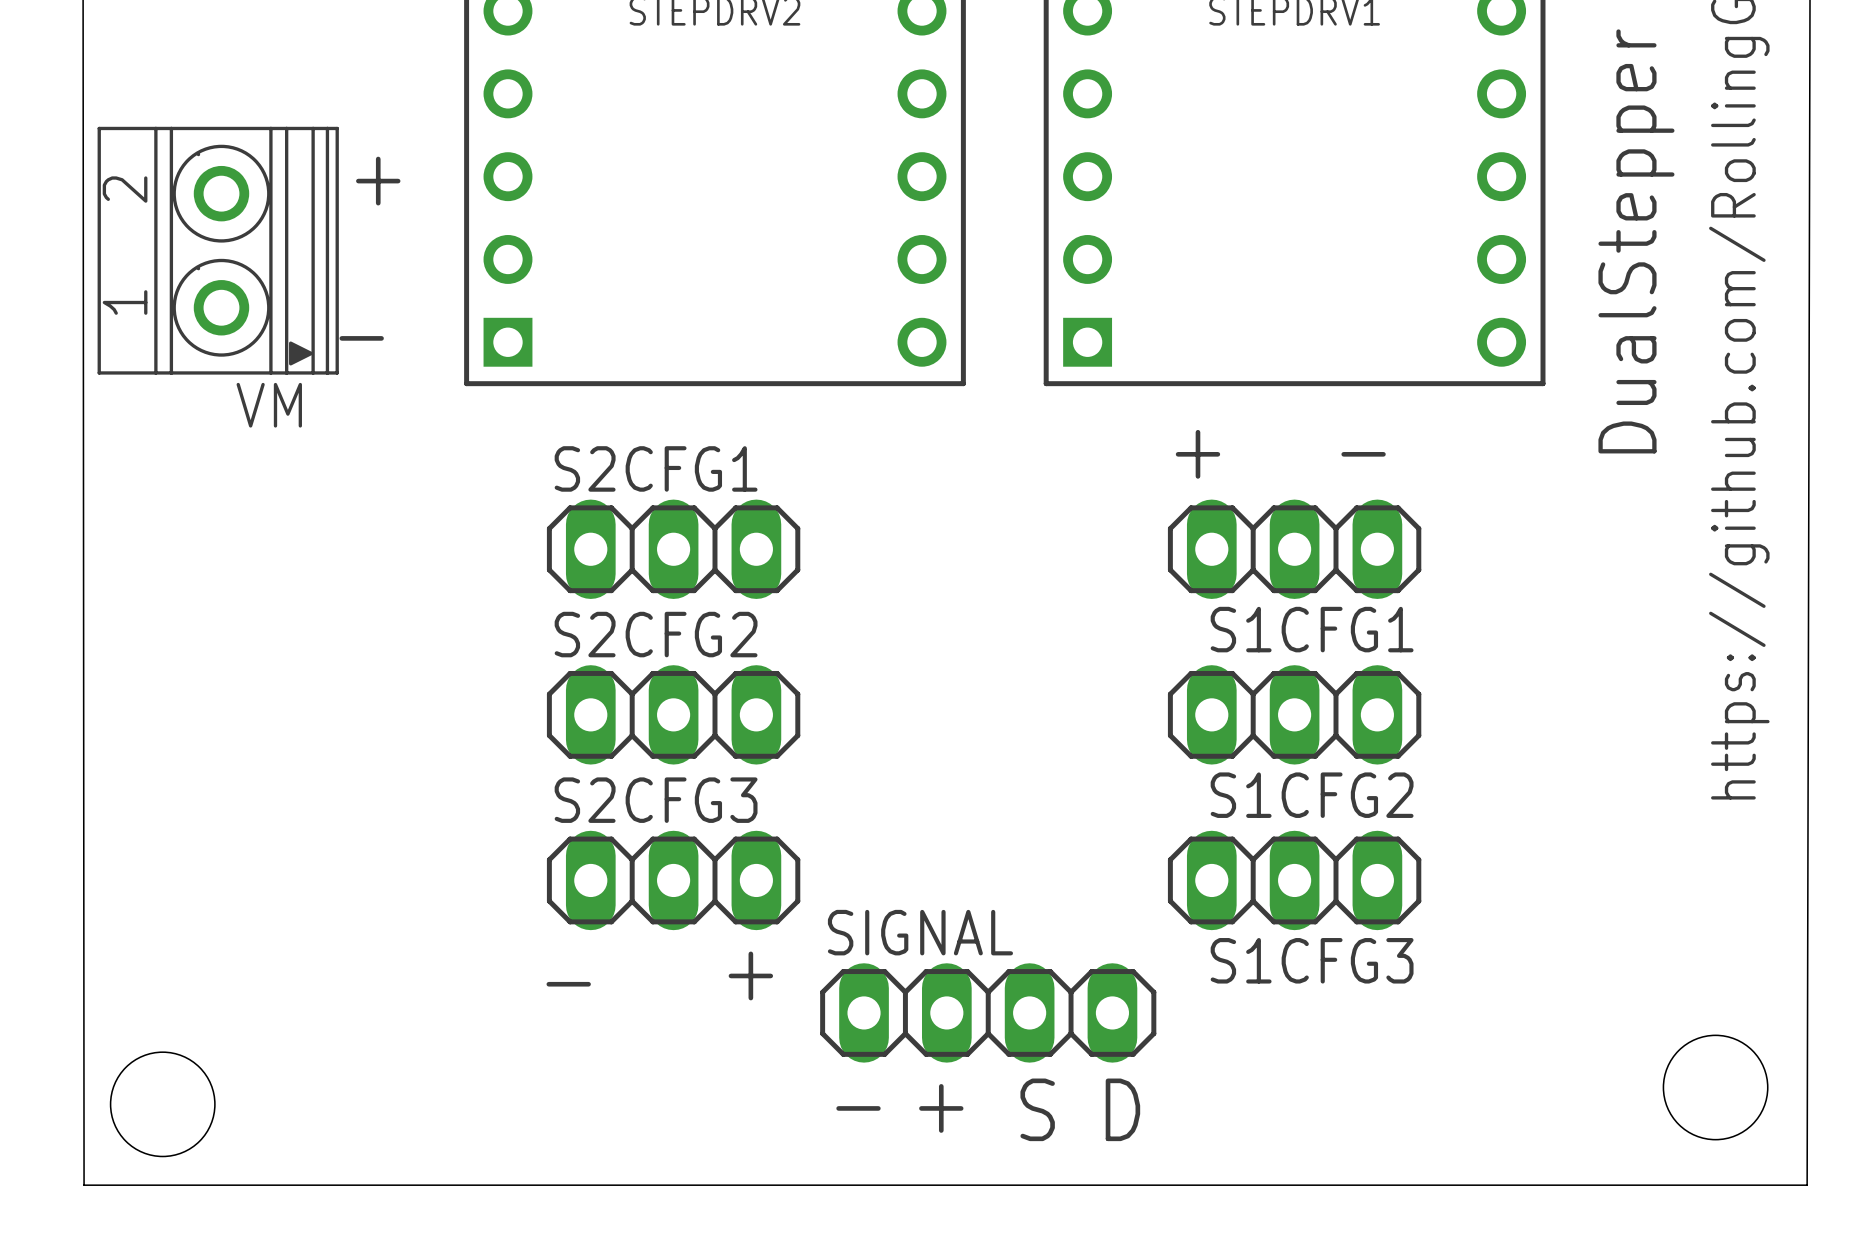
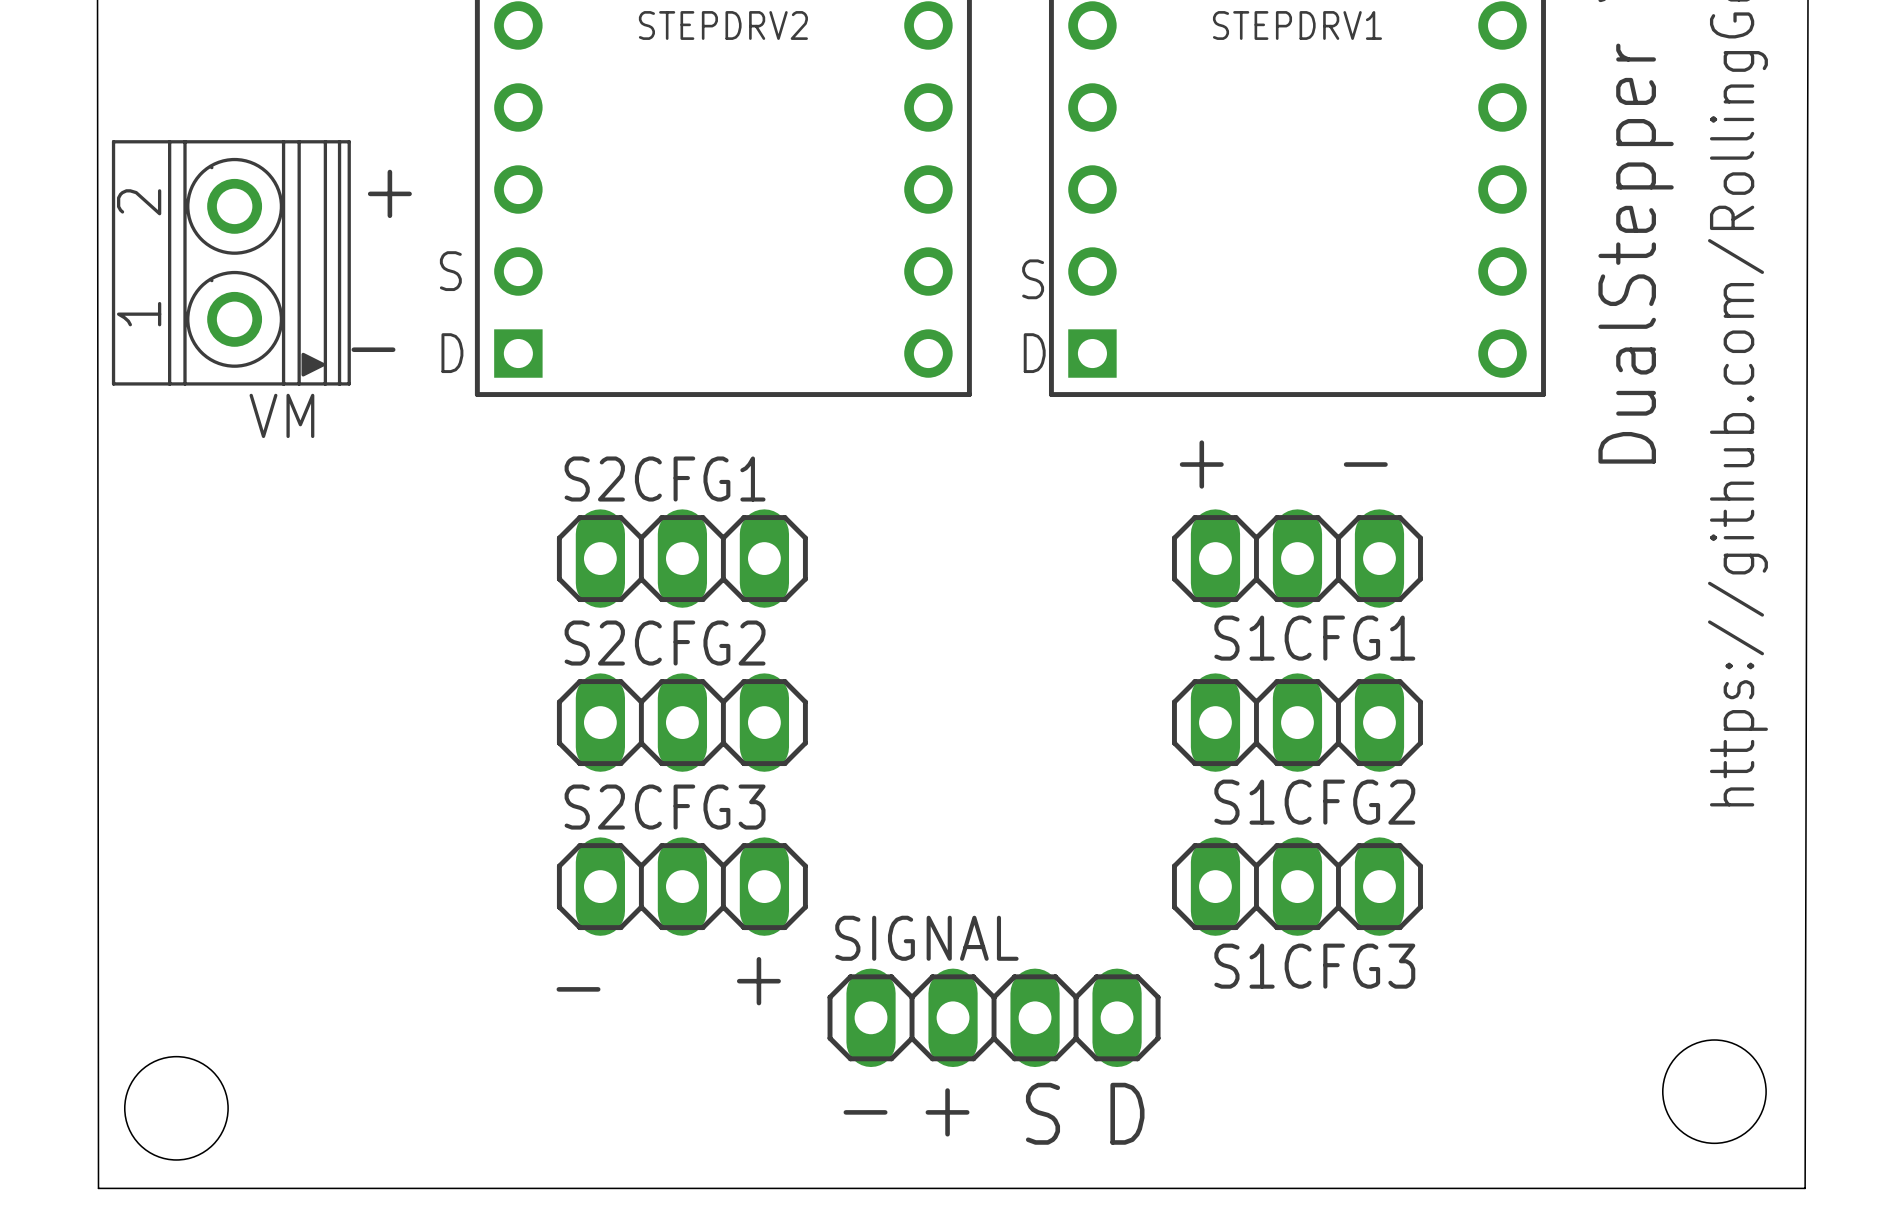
text: none -> S (450, 271)
text: none -> S (1033, 279)
text: none -> D (452, 353)
text: none -> D (1034, 353)

